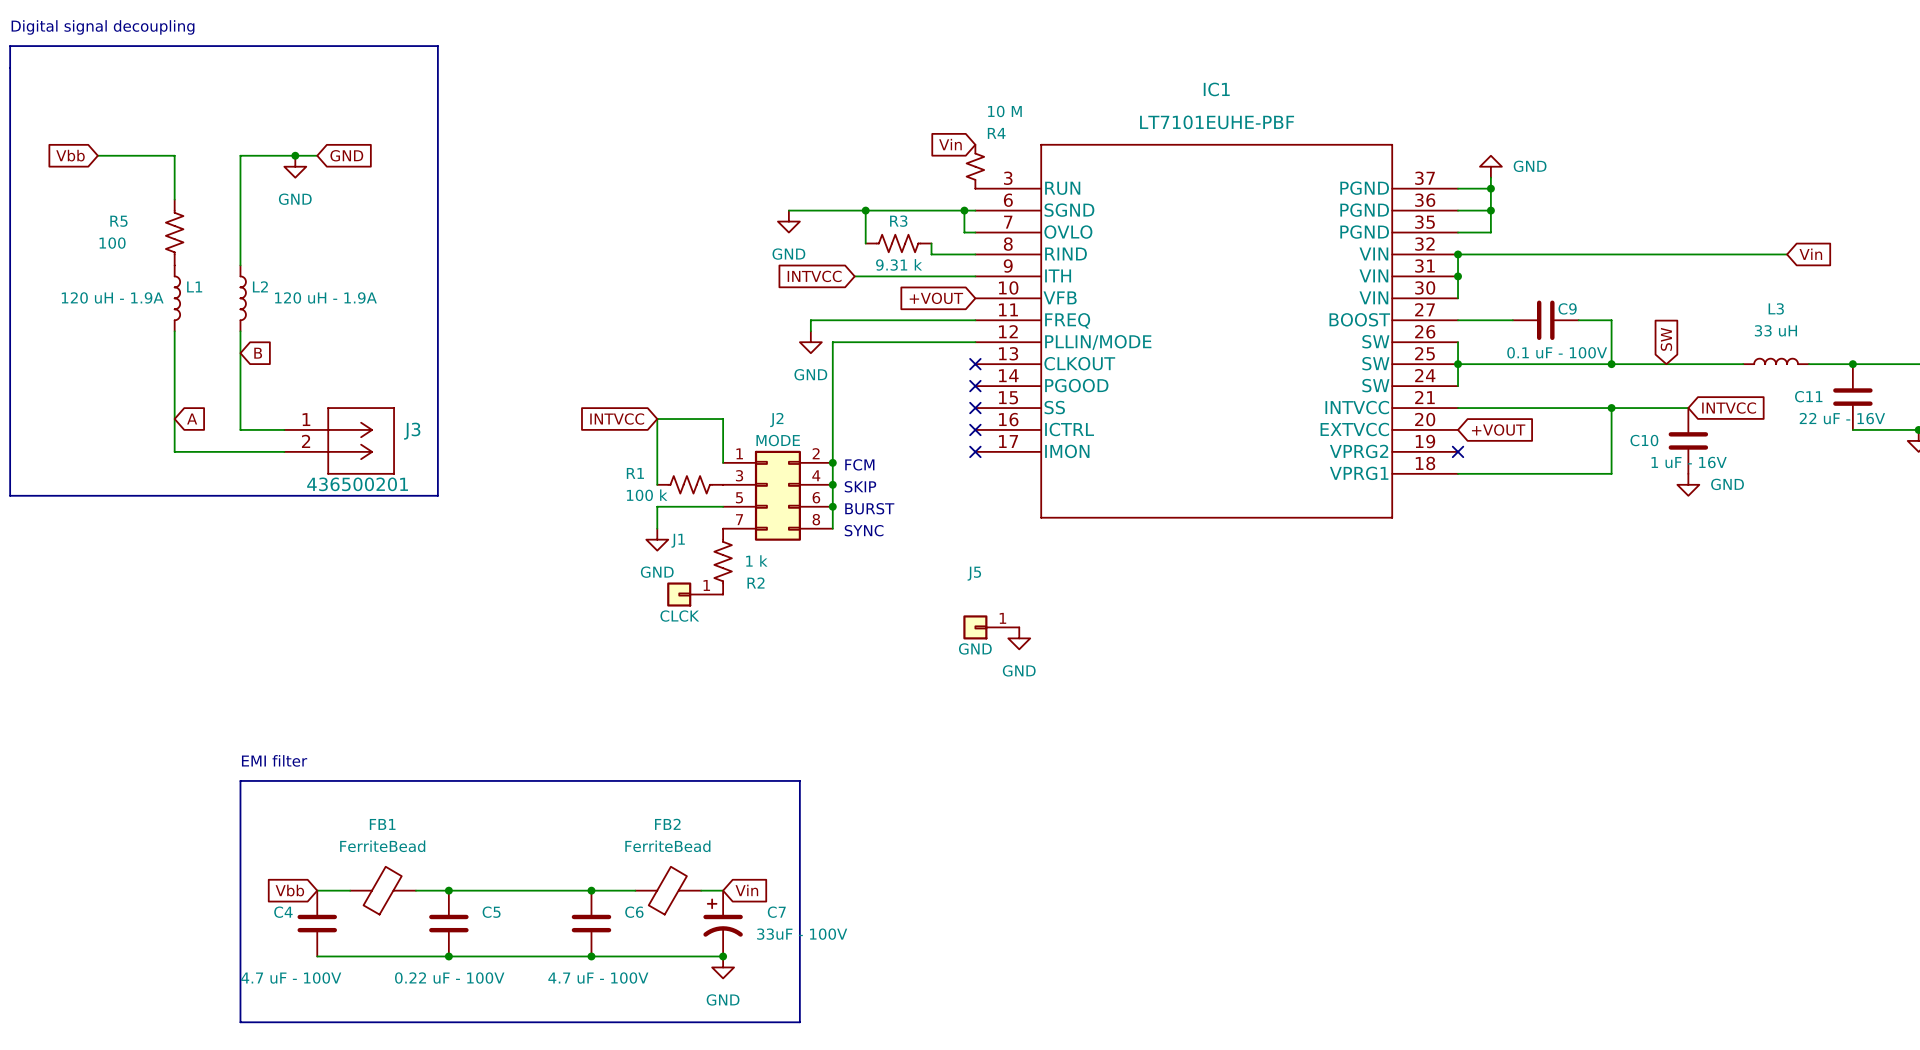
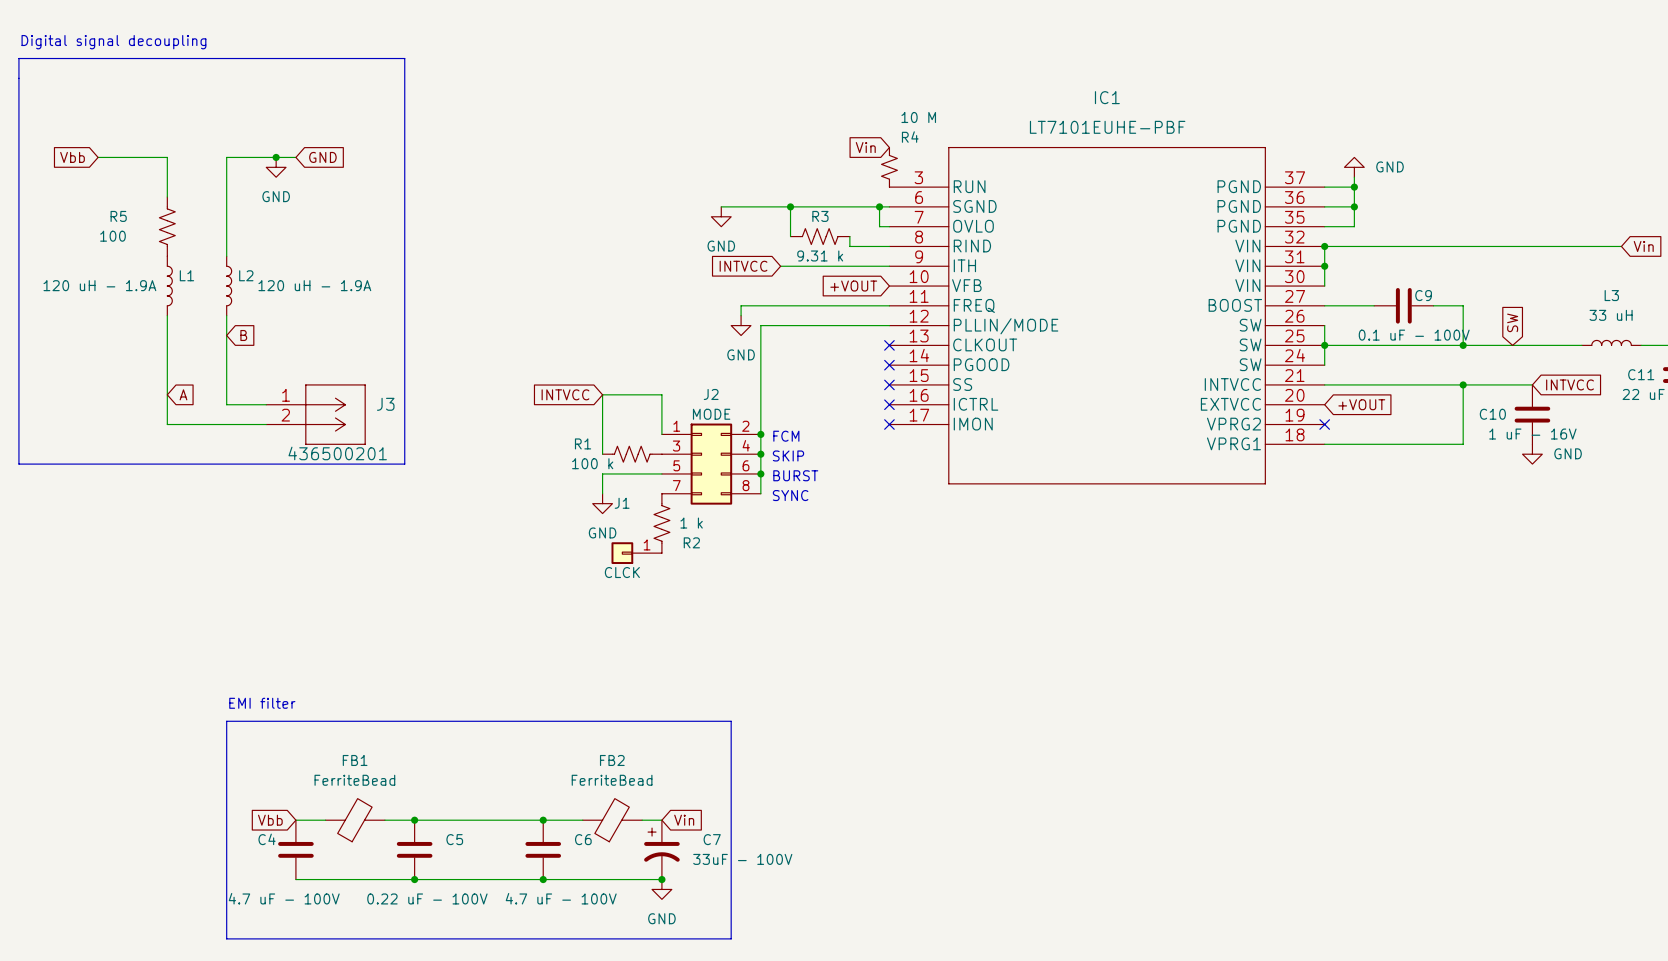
J5: GND (991, 627) -> none
power symbol: GND (1019, 638) -> none

